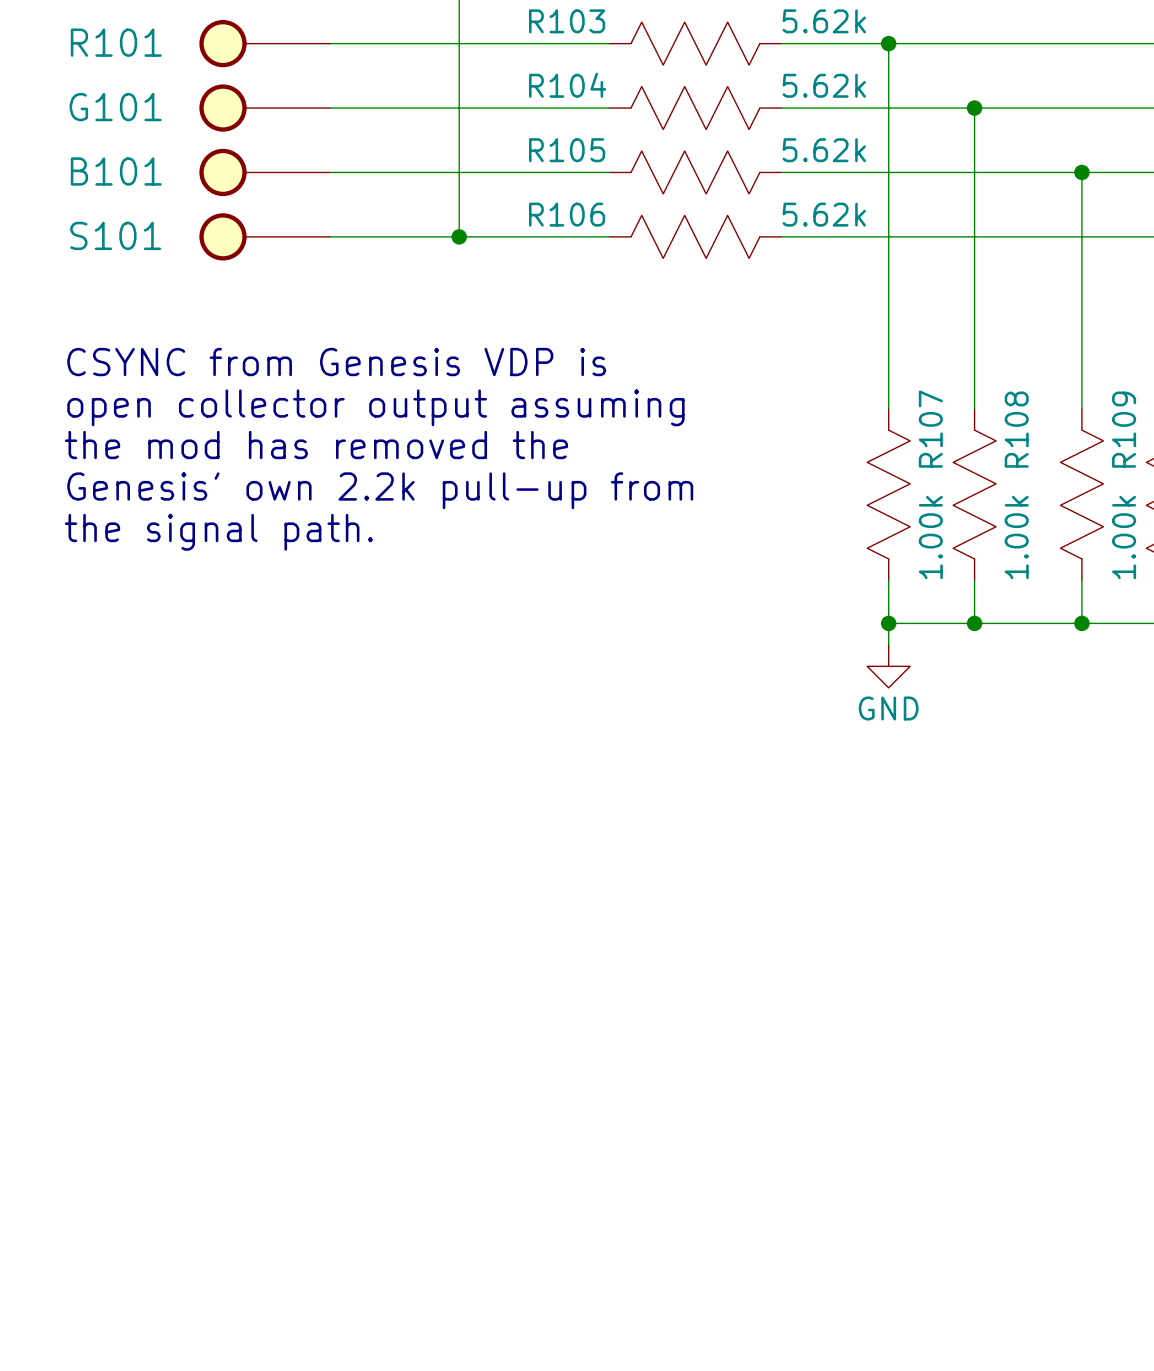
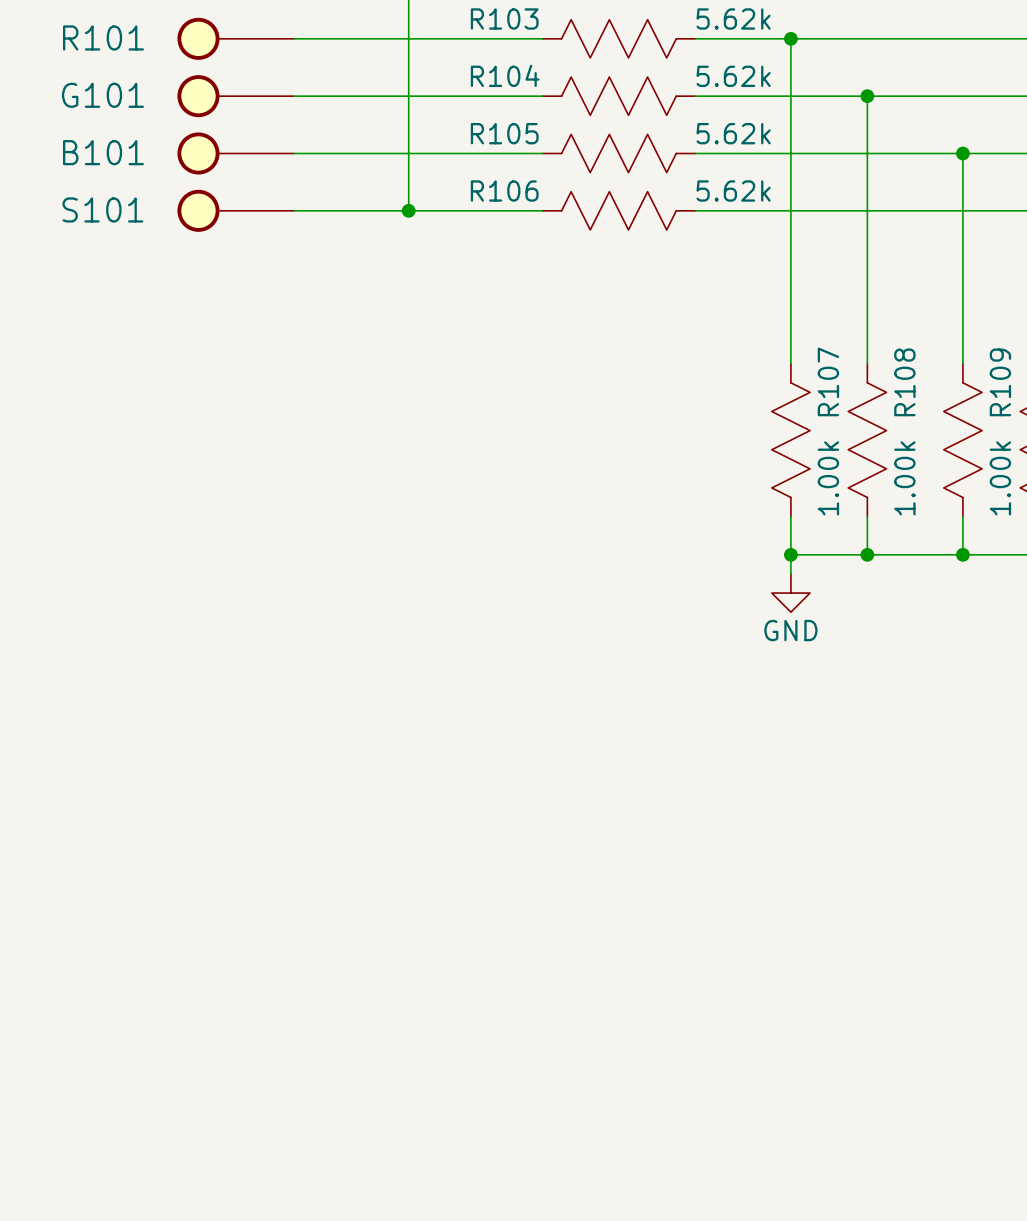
text: CSYNC from Genesis VDP is (336, 362) -> none
text: open collector output assuming (375, 407) -> none
text: the mod has removed the (316, 445) -> none
text: Genesis' own 2.2k pull-up from (380, 490) -> none
text: the signal path. (218, 532) -> none

